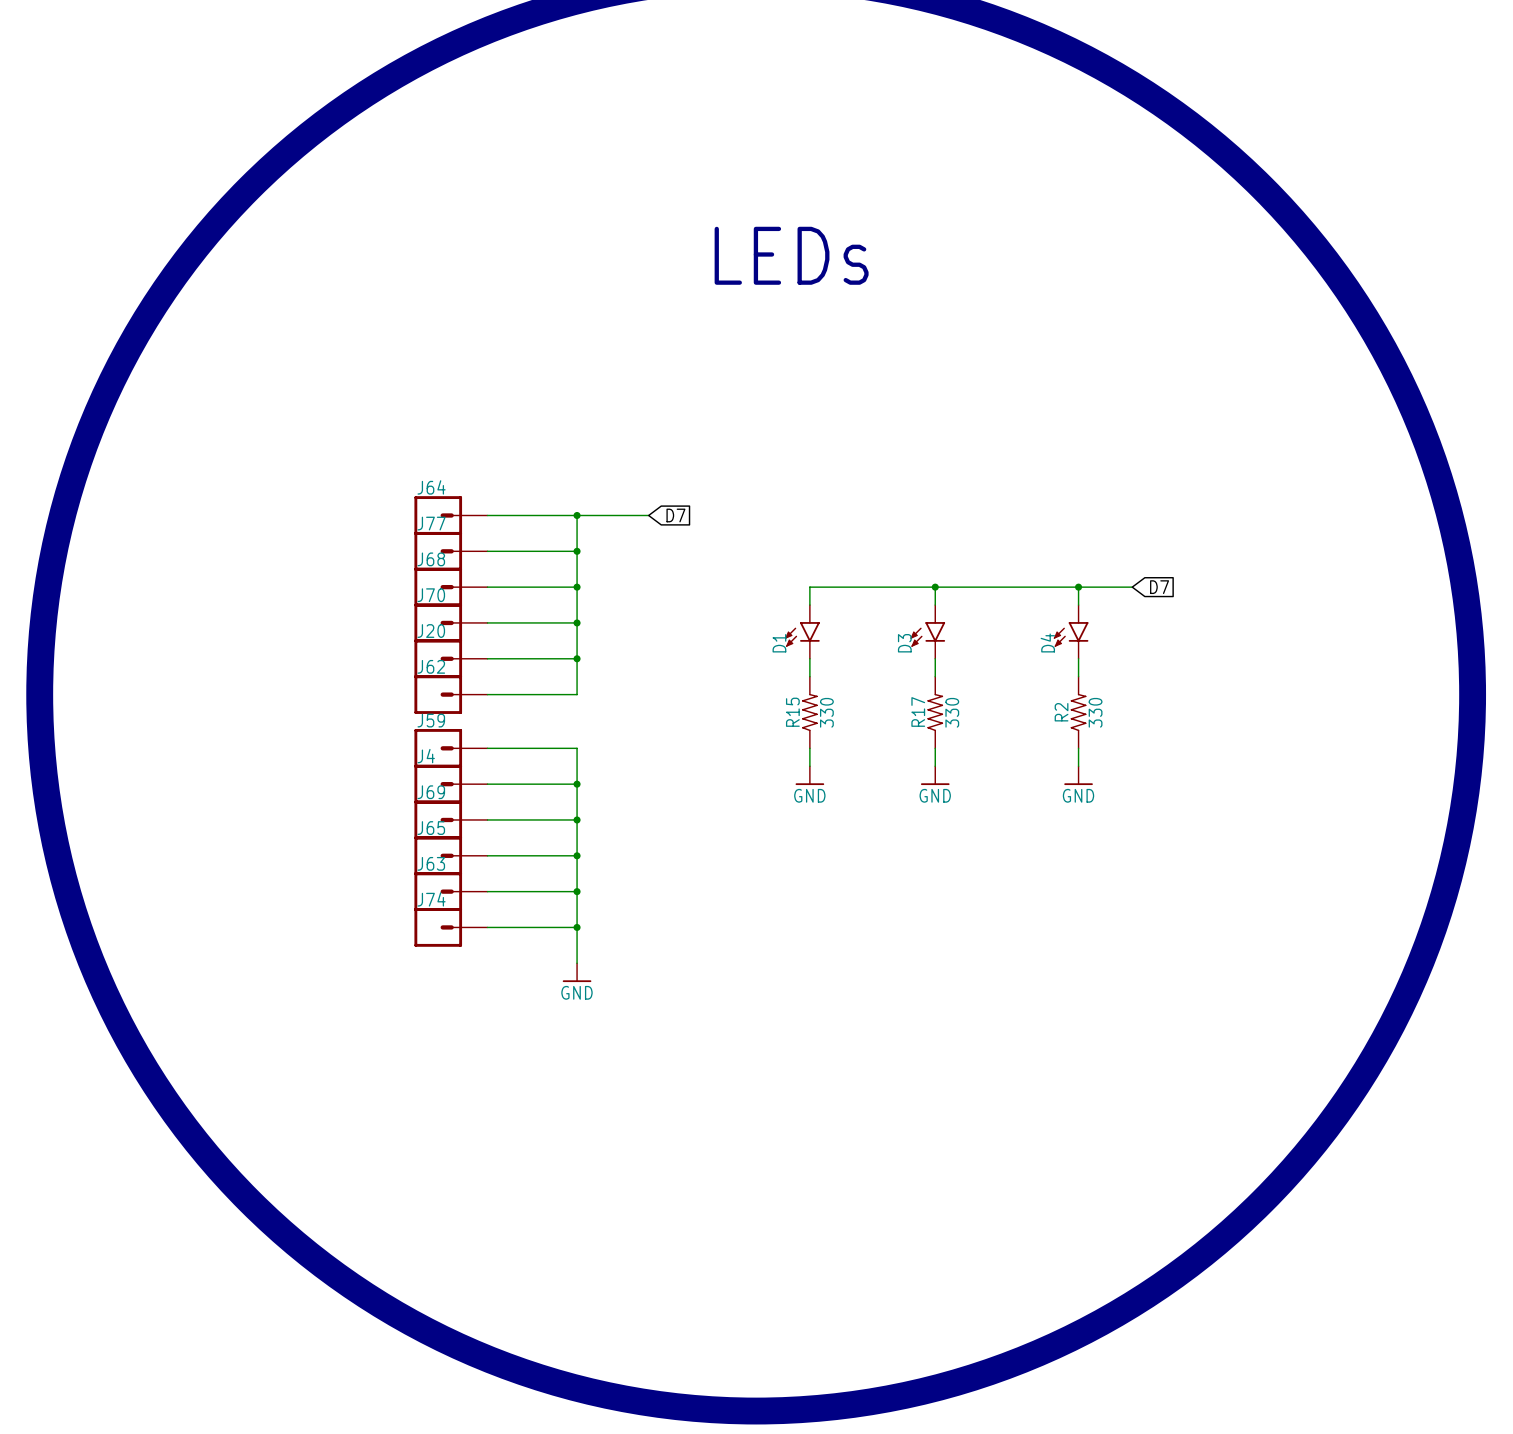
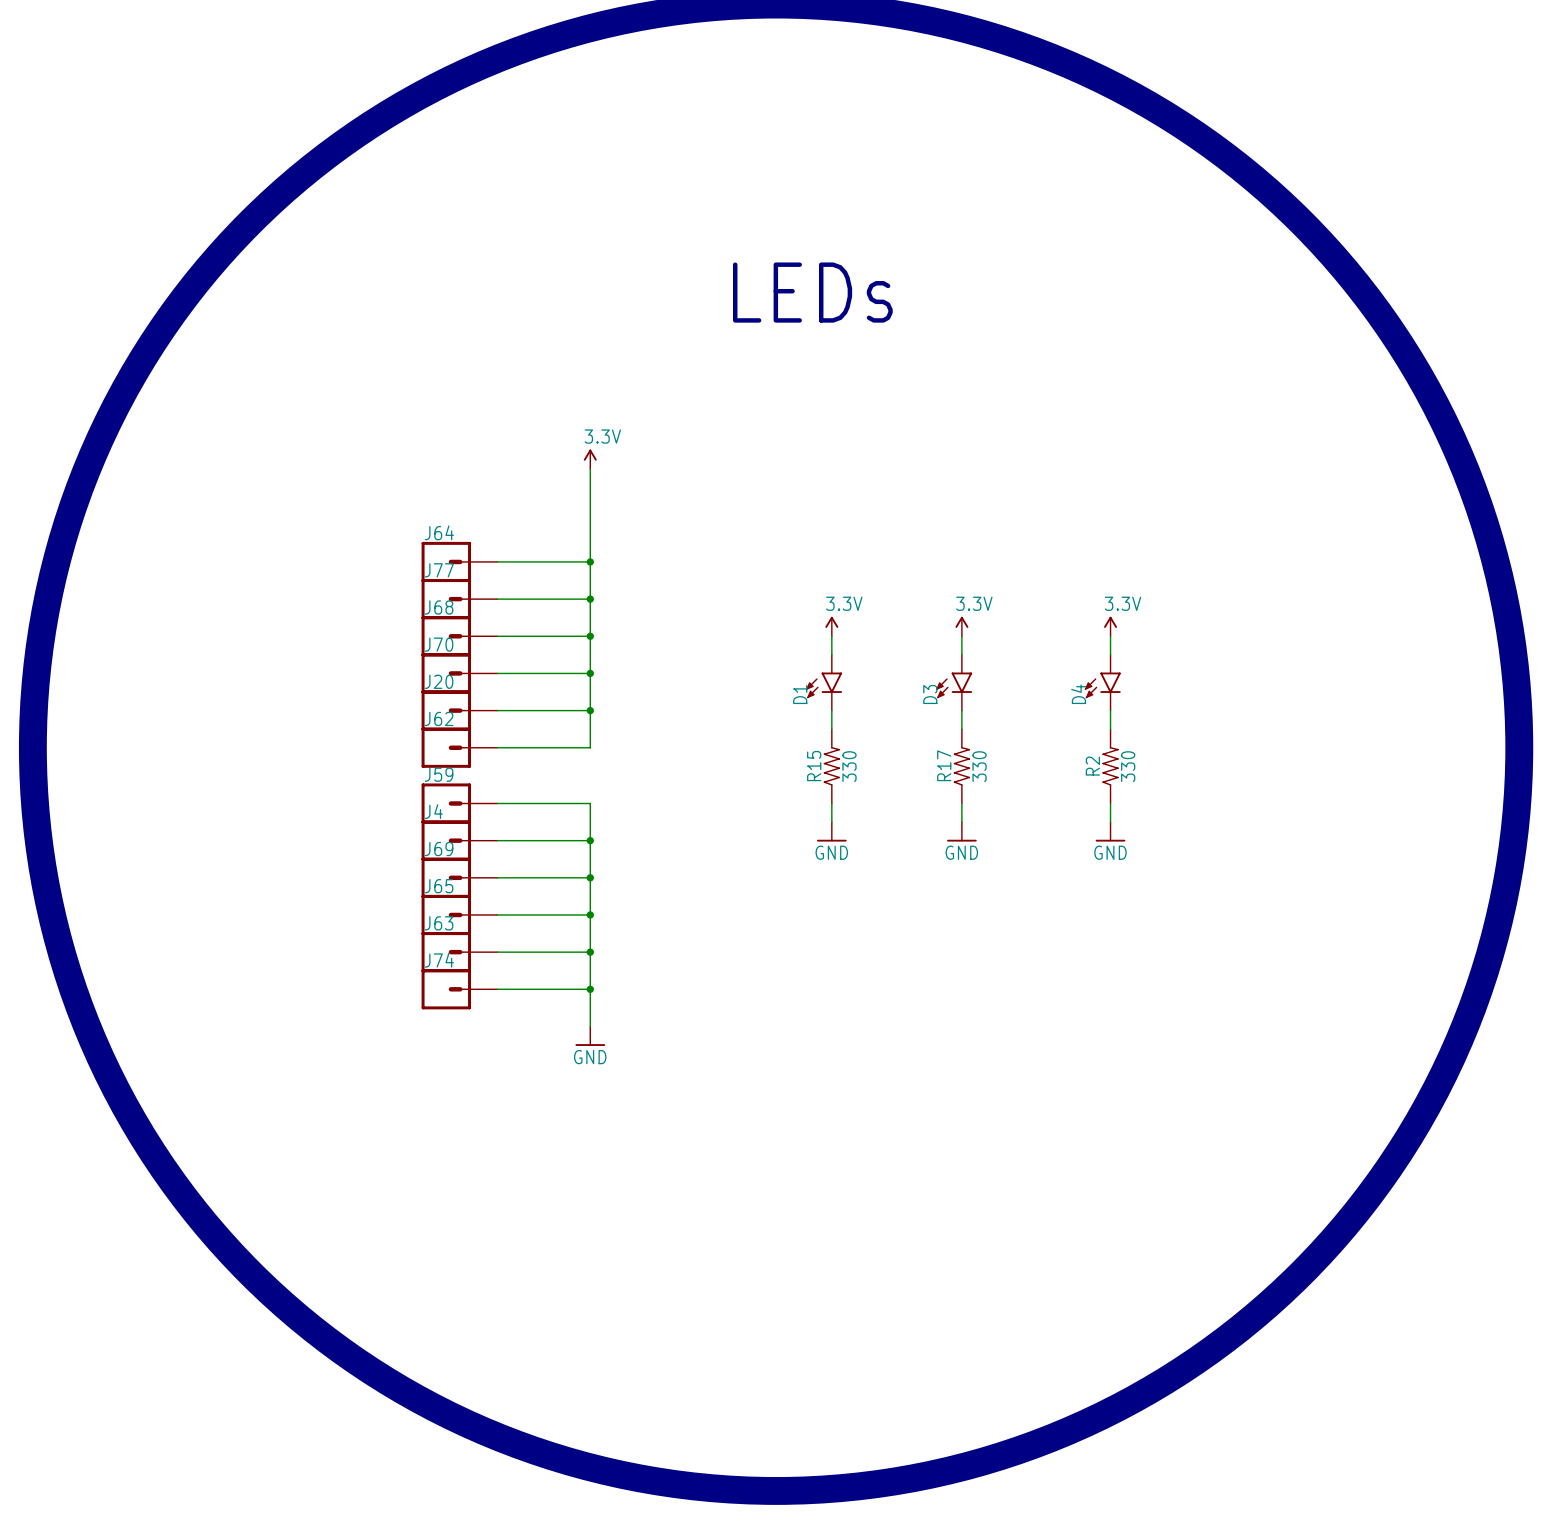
power symbol: none -> 3.3V (590, 459)
wire: (577, 515) (648, 515) -> (590, 561) (590, 469)
global label: D7 (675, 515) -> none
power symbol: none -> 3.3V (831, 626)
power symbol: none -> 3.3V (961, 626)
power symbol: none -> 3.3V (1110, 626)
wire: (809, 587) (1132, 587) -> none
junction: (935, 587) -> none
junction: (1078, 587) -> none
global label: D7 (1159, 587) -> none

